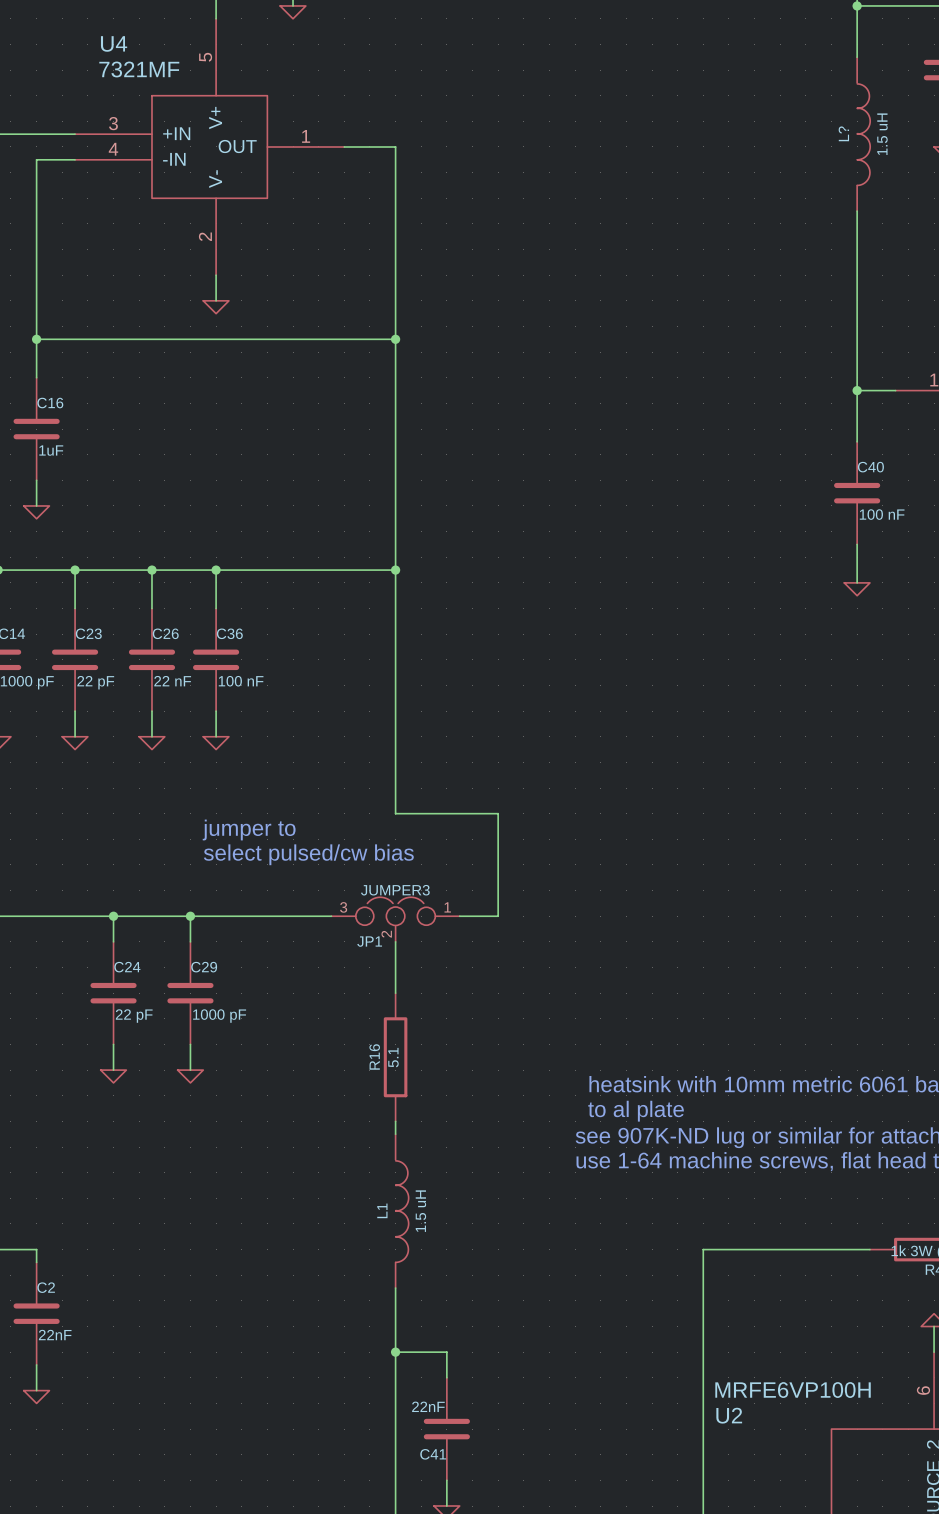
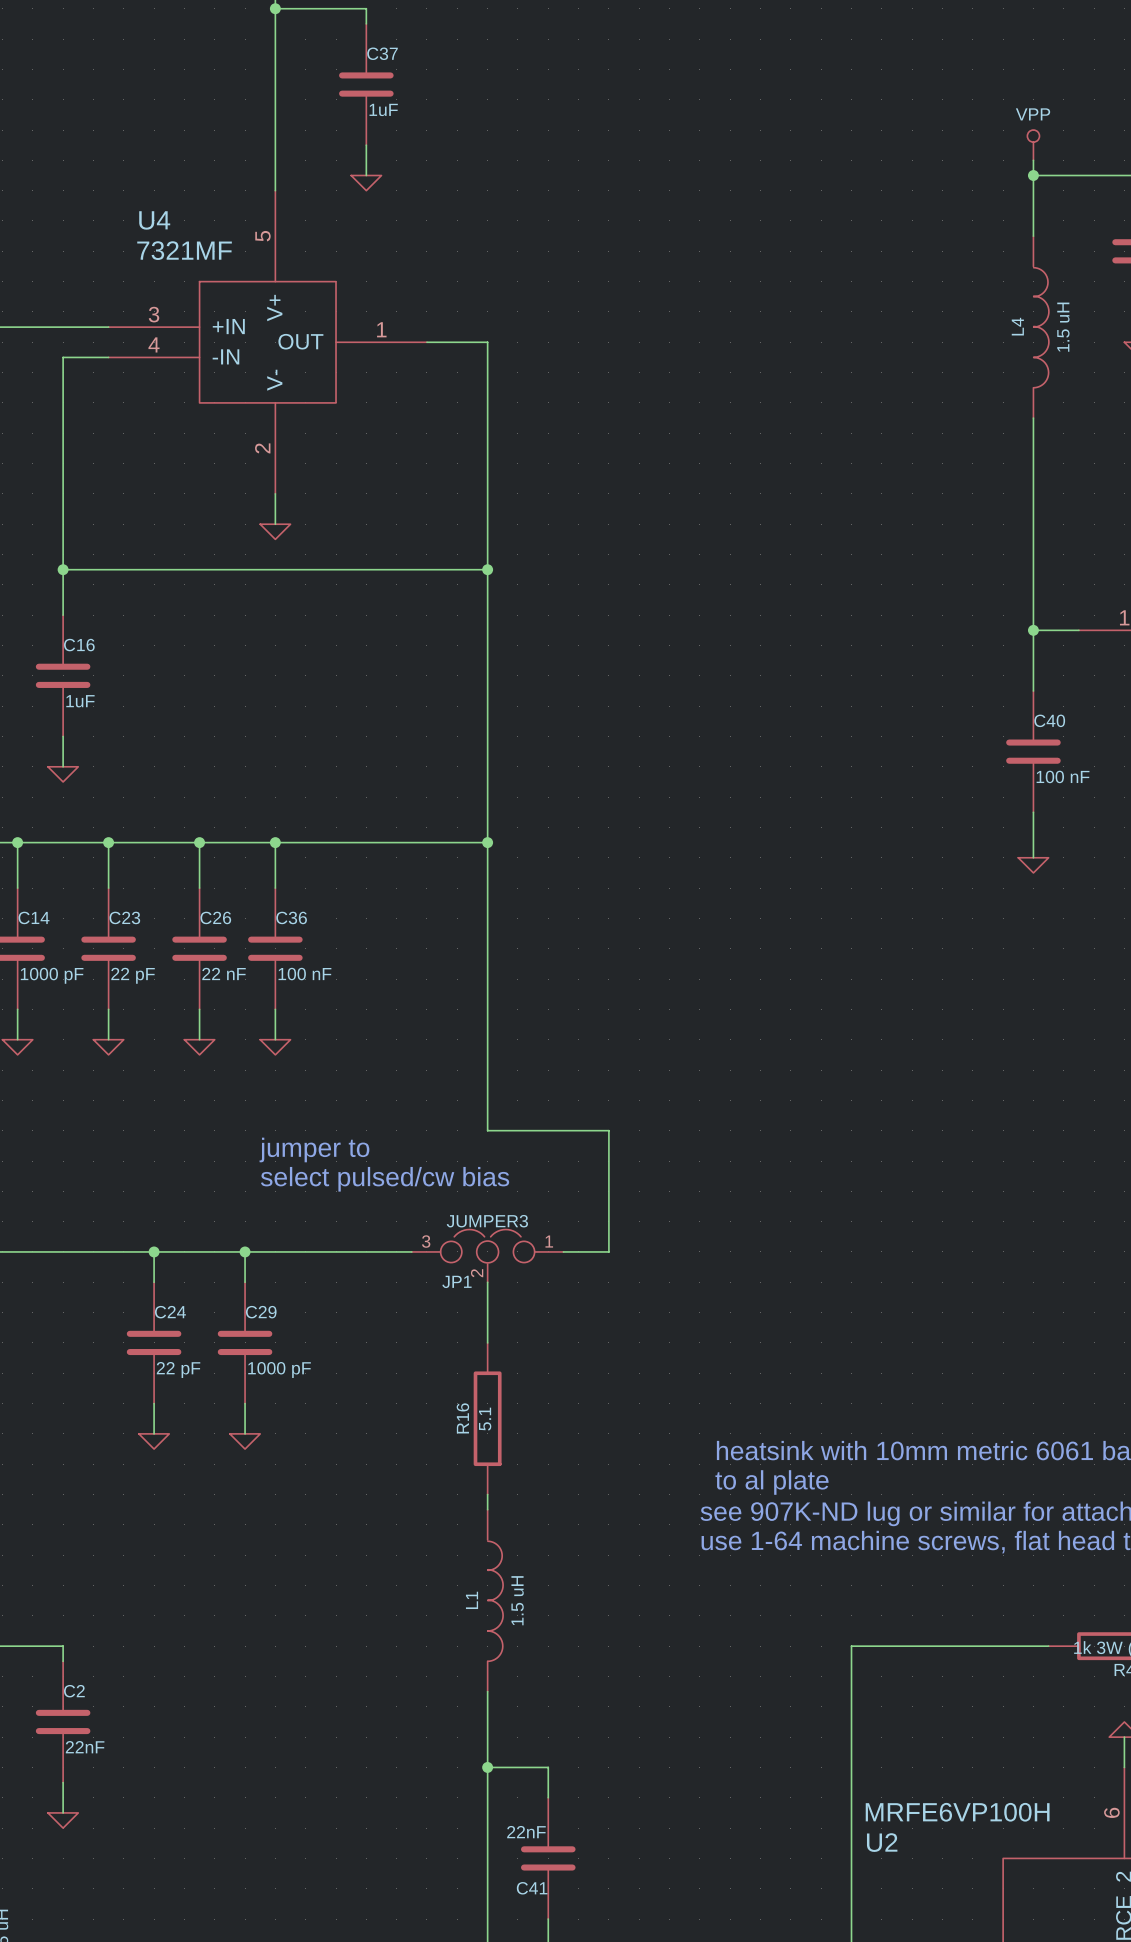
L? name: L? (843, 133) -> L4 (1017, 326)

